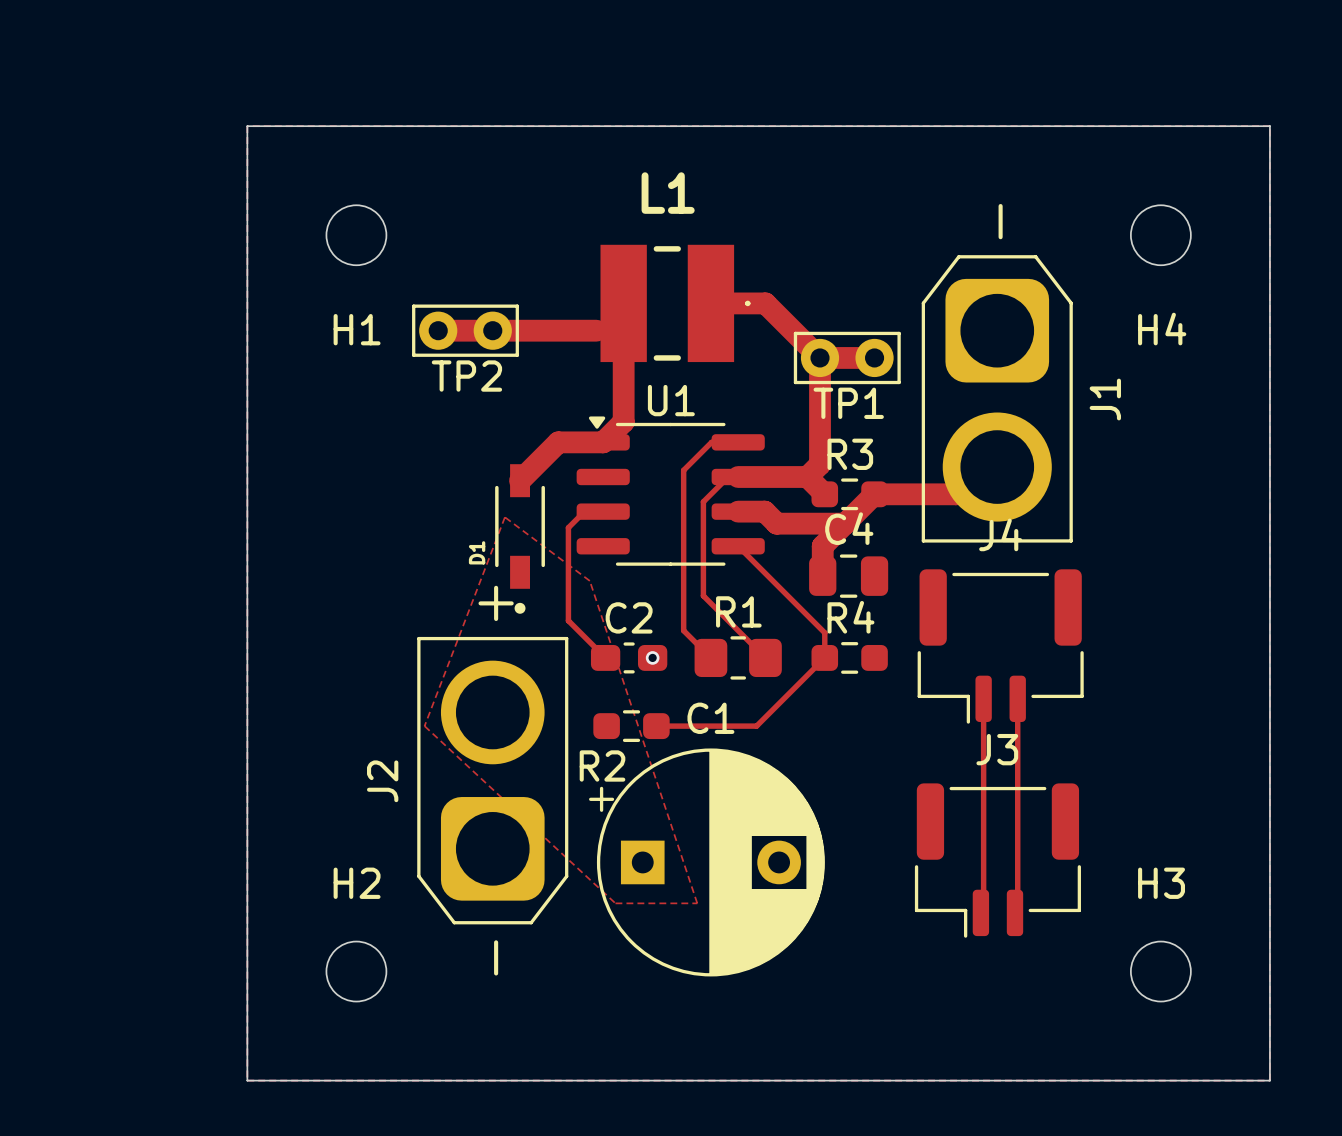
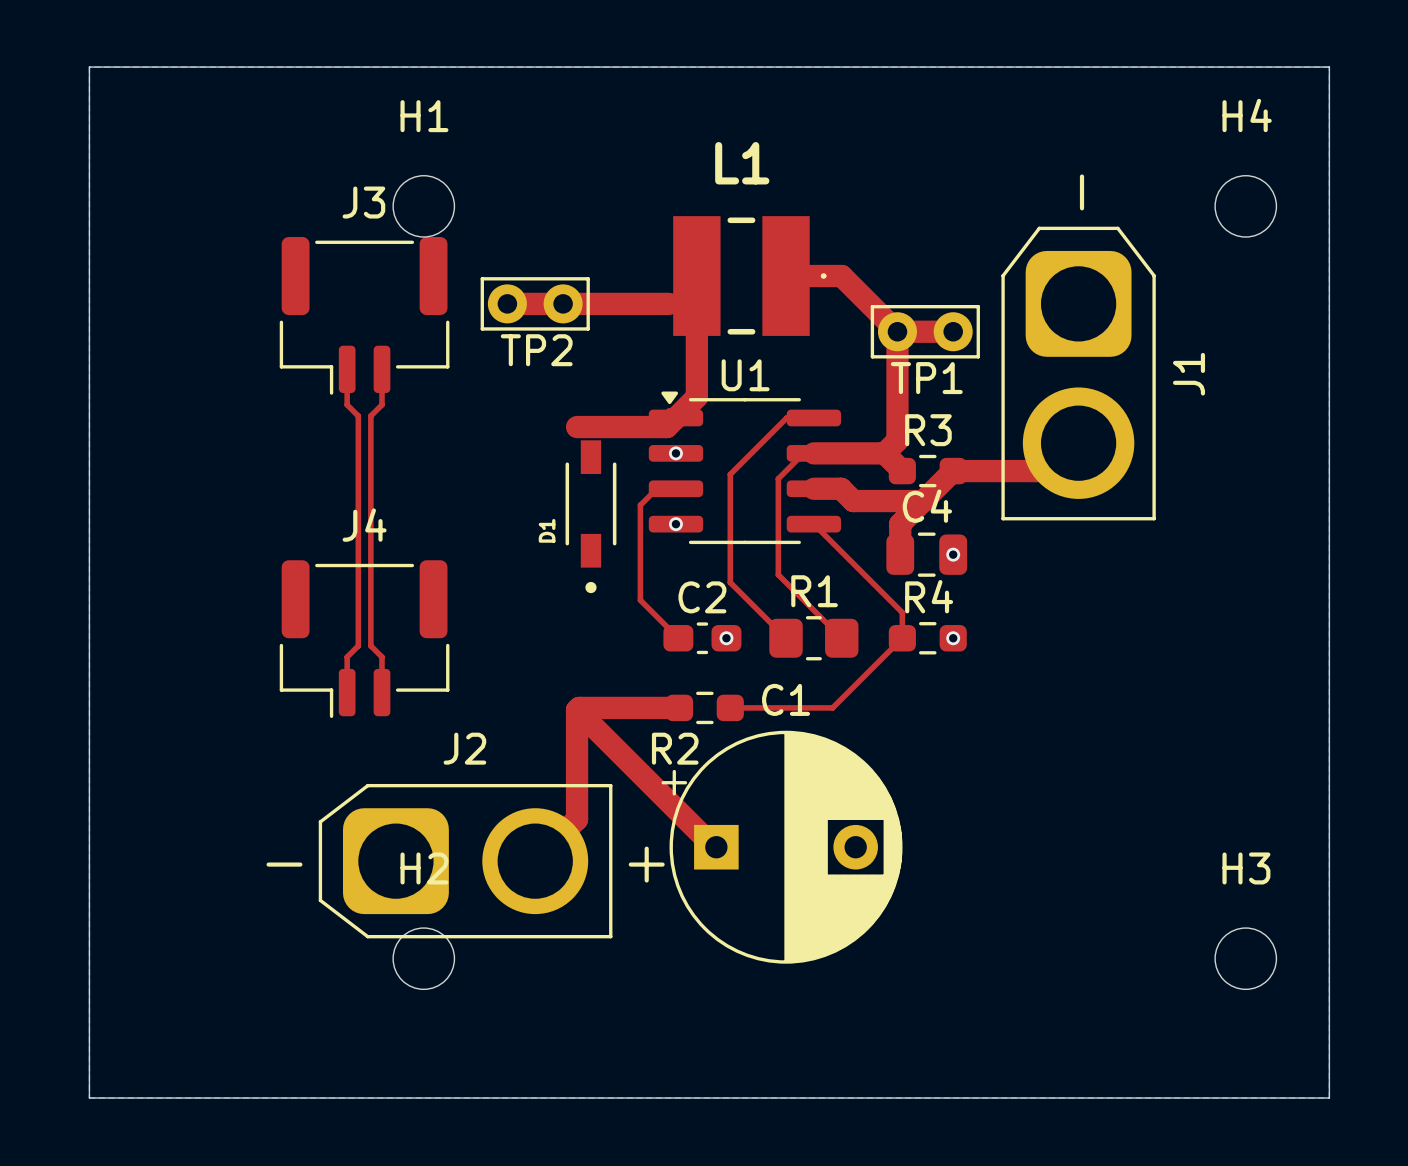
board edge: (247, 126) (1269, 126) (1269, 1080) (247, 1080) (247, 126) -> (89, 67) (89, 1098) (1329, 1098) (1329, 67) (89, 67)
H1 name position: H1 (357, 329) -> H1 (424, 116)
H4 name position: H4 (1162, 329) -> H4 (1247, 115)
top track: none -> (347, 369) (347, 404) (358, 416) (358, 645) (347, 657) (347, 692)
top track: none -> (382, 369) (382, 404) (370, 416) (370, 645) (382, 657) (382, 692)
top track: (603, 442) (558, 442) (520, 480) -> (675, 417) (666, 427) (577, 427)
top track: (683, 470) (683, 630) -> (758, 446) (730, 474) (730, 582) (758, 610)
via: none -> (675, 453)
top zone outline: (504, 517) (424, 726) (615, 903) (697, 903) (589, 580) (504, 517) -> none
via: none -> (675, 524)
via: none -> (953, 554)
J4 position: (1000, 646) -> (364, 639)
via: none -> (953, 638)
top track: (983, 698) (983, 910) (980, 912) -> none
top track: (1017, 698) (1017, 910) (1014, 912) -> none
top track: none -> (679, 707) (579, 707) (577, 710)
top track: none -> (577, 710) (577, 819) (535, 861)
top track: none -> (577, 710) (714, 847)
J2 rotation: 0° (492, 780) -> 90° clockwise (465, 861)
J3 position: (997, 860) -> (364, 315)

